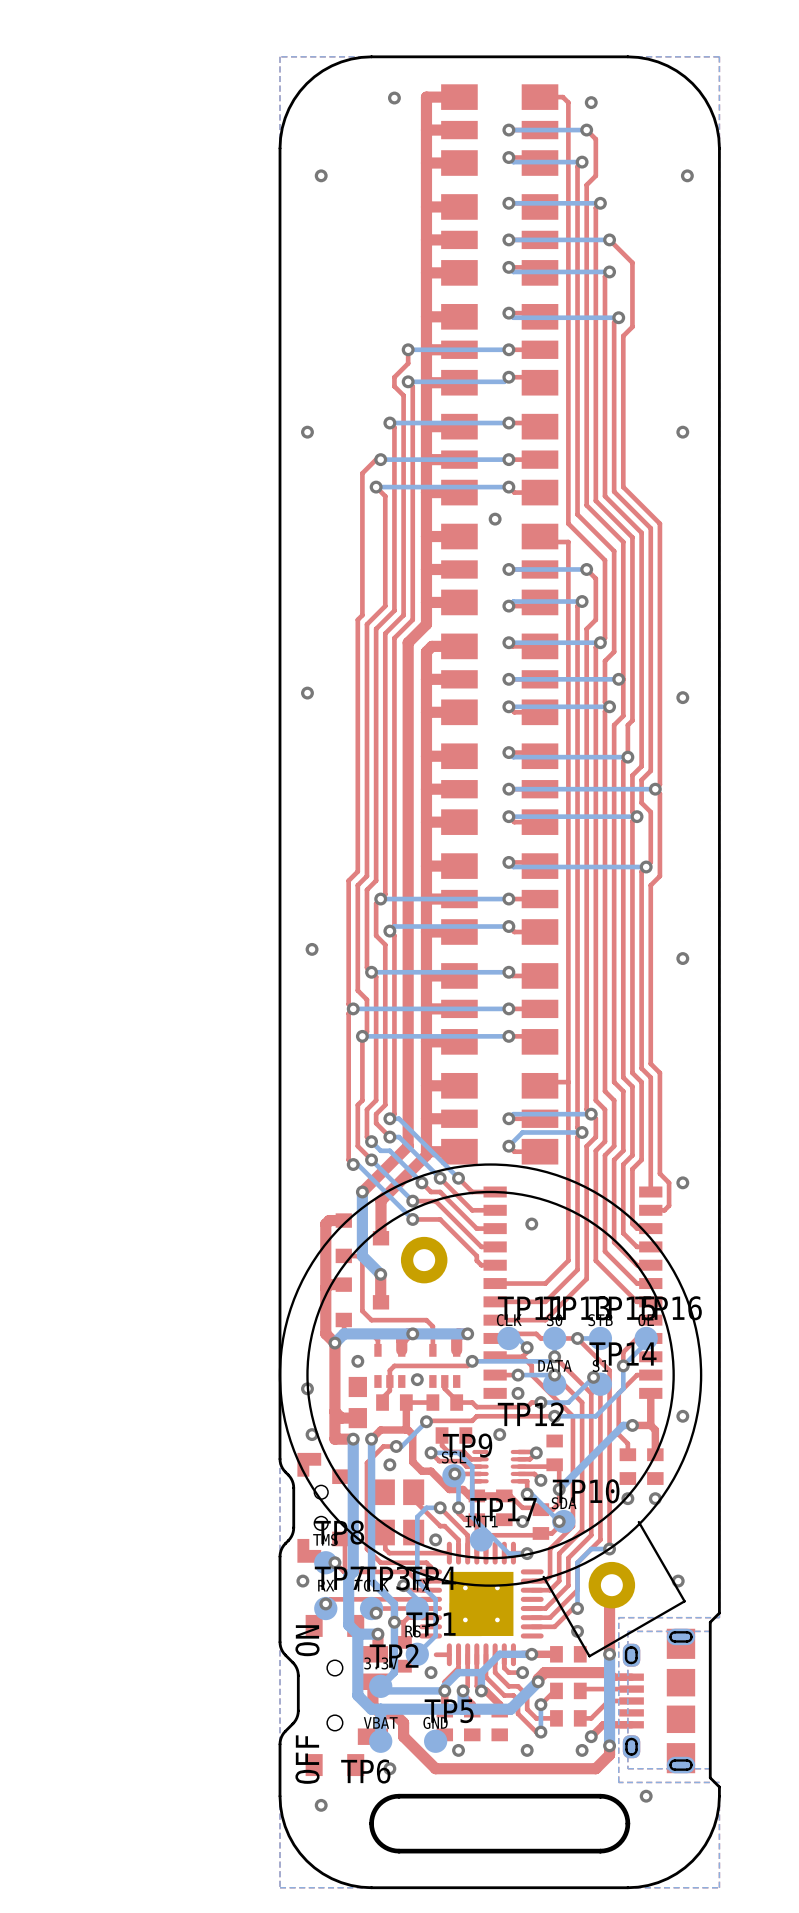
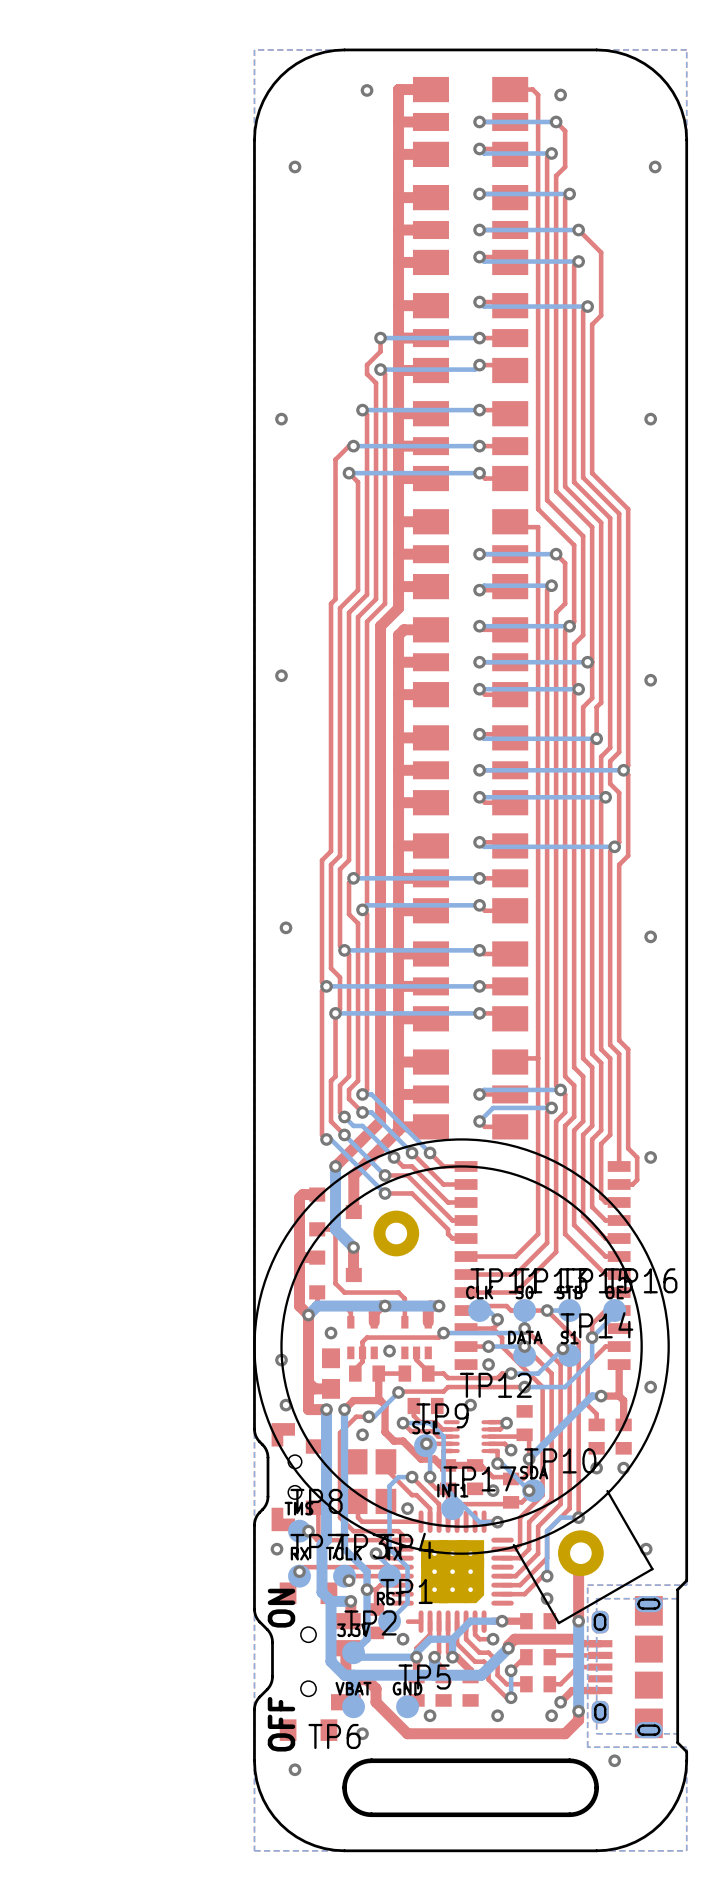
via: (495, 519) -> none
via: (531, 1224) -> none
part footprint: [419, 1541, 544, 1667] -> [391, 1510, 514, 1633]

